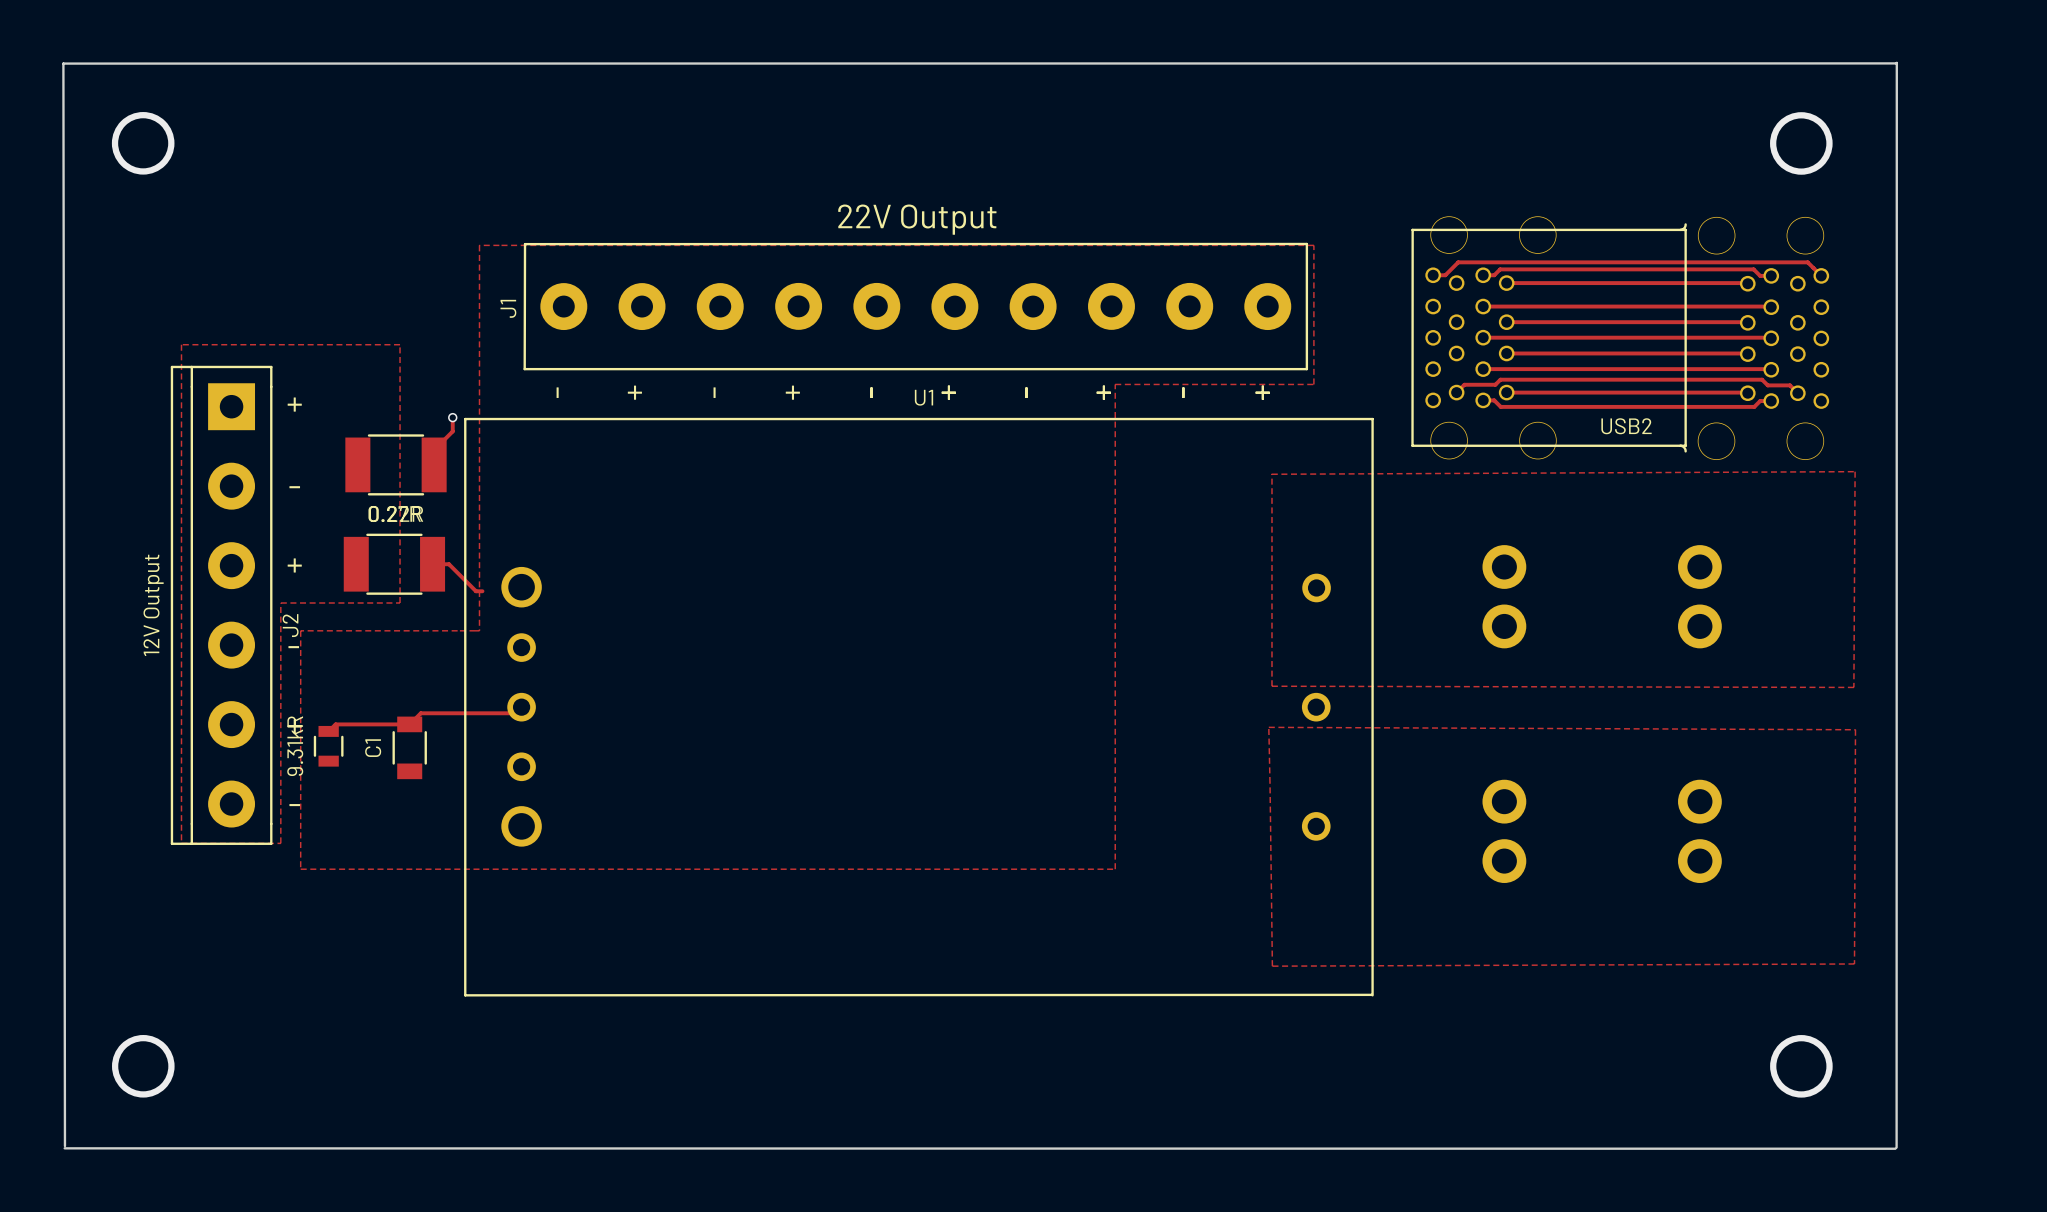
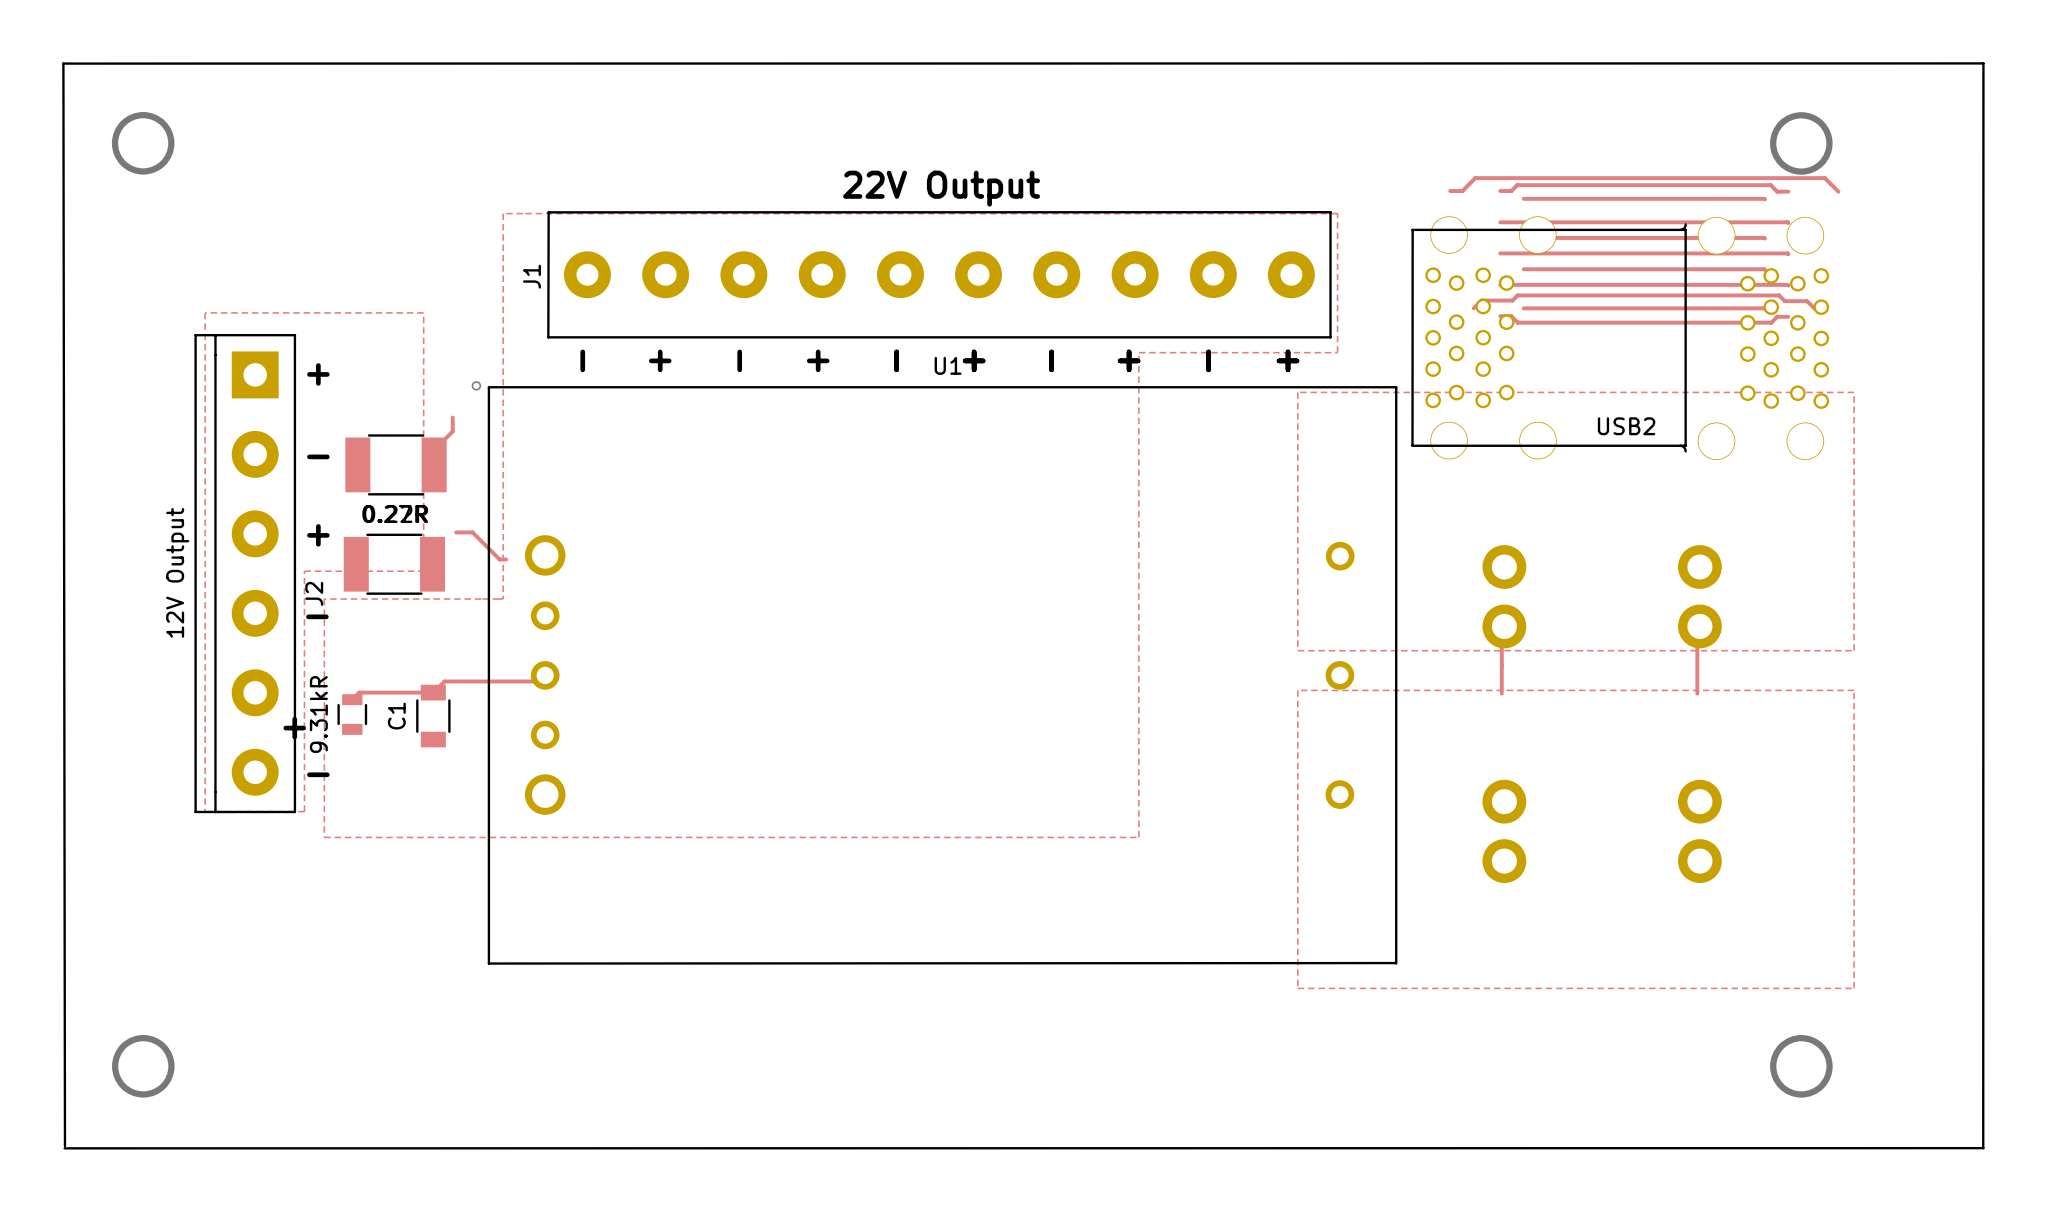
board edge: (1896, 62) (1896, 1147) -> none
board edge: none -> (1896, 63) (1983, 63) (1983, 1148)
text position: 22V Output (917, 219) -> 22V Output (941, 188)
zone outline: (479, 245) (1313, 245) (1313, 384) (1115, 384) (1115, 869) (300, 869) (300, 630) (479, 630) (479, 245) -> (503, 213) (1337, 213) (1337, 352) (1138, 352) (1138, 837) (324, 837) (324, 599) (503, 599) (503, 213)
track: (1433, 275) (1445, 275) (1458, 262) (1807, 262) (1821, 275) -> (1450, 191) (1462, 191) (1475, 178) (1824, 178) (1838, 191)
track: (1483, 275) (1494, 275) (1500, 269) (1753, 269) (1760, 275) (1771, 275) -> (1500, 191) (1511, 191) (1517, 185) (1770, 185) (1777, 191) (1788, 191)
track: (1506, 283) (1747, 283) -> (1523, 198) (1764, 199)
J1 position: (915, 306) -> (939, 274)
track: (1483, 306) (1771, 307) -> (1500, 222) (1788, 222)
track: (1506, 322) (1747, 322) -> (1523, 237) (1764, 238)
track: (1483, 337) (1771, 338) -> (1500, 253) (1788, 254)
zone outline: (181, 344) (400, 344) (400, 602) (280, 602) (280, 843) (181, 843) (181, 344) -> (205, 312) (423, 312) (423, 571) (304, 571) (304, 811) (205, 811) (205, 312)
track: (1506, 353) (1747, 354) -> (1523, 269) (1764, 269)
track: (1483, 369) (1771, 369) -> (1500, 284) (1788, 285)
text position: - (557, 392) -> - (582, 360)
text position: + (634, 392) -> + (660, 360)
text position: - (714, 392) -> - (739, 360)
text position: + (792, 392) -> + (818, 360)
text position: - (871, 392) -> - (896, 360)
text position: + (948, 392) -> + (974, 360)
text position: - (1026, 392) -> - (1051, 360)
text position: + (1103, 392) -> + (1129, 360)
text position: - (1183, 392) -> - (1208, 360)
text position: + (1262, 392) -> + (1288, 360)
track: (1456, 392) (1464, 384) (1495, 384) (1500, 379) (1762, 379) (1767, 385) (1790, 385) (1797, 393) -> (1473, 308) (1481, 300) (1512, 300) (1517, 295) (1779, 295) (1784, 301) (1807, 301) (1814, 308)
track: (1506, 392) (1747, 393) -> (1523, 308) (1764, 308)
track: (1483, 400) (1494, 400) (1500, 406) (1754, 406) (1760, 401) (1771, 401) -> (1500, 316) (1511, 316) (1517, 322) (1771, 322) (1777, 316) (1788, 316)
text position: + (294, 404) -> + (318, 374)
via position: (452, 417) -> (476, 385)
zone outline: (1271, 474) (1855, 471) (1853, 687) (1271, 686) (1271, 474) -> (1297, 392) (1297, 650) (1854, 650) (1854, 392) (1297, 392)
text position: - (294, 487) -> - (318, 456)
track: (432, 564) (448, 564) (476, 591) (482, 591) -> (456, 532) (472, 532) (499, 559) (506, 559)
text position: + (294, 565) -> + (318, 535)
J2 position: (221, 605) -> (245, 573)
track: none -> (1501, 634) (1501, 693)
track: none -> (1697, 634) (1697, 693)
text position: - (293, 647) -> - (317, 616)
U1 position: (918, 707) -> (942, 675)
track: (521, 713) (420, 713) (409, 724) (335, 724) (328, 731) -> (545, 681) (444, 681) (433, 692) (359, 692) (352, 699)
zone outline: (1268, 727) (1855, 729) (1854, 963) (1272, 966) (1268, 727) -> (1297, 690) (1297, 988) (1854, 988) (1854, 690) (1297, 690)
9.31kR position: (328, 746) -> (352, 714)
C1 position: (409, 747) -> (433, 716)
text position: - (294, 805) -> - (318, 774)
board edge: (64, 1148) (1895, 1148) -> (64, 1148) (1983, 1148)

